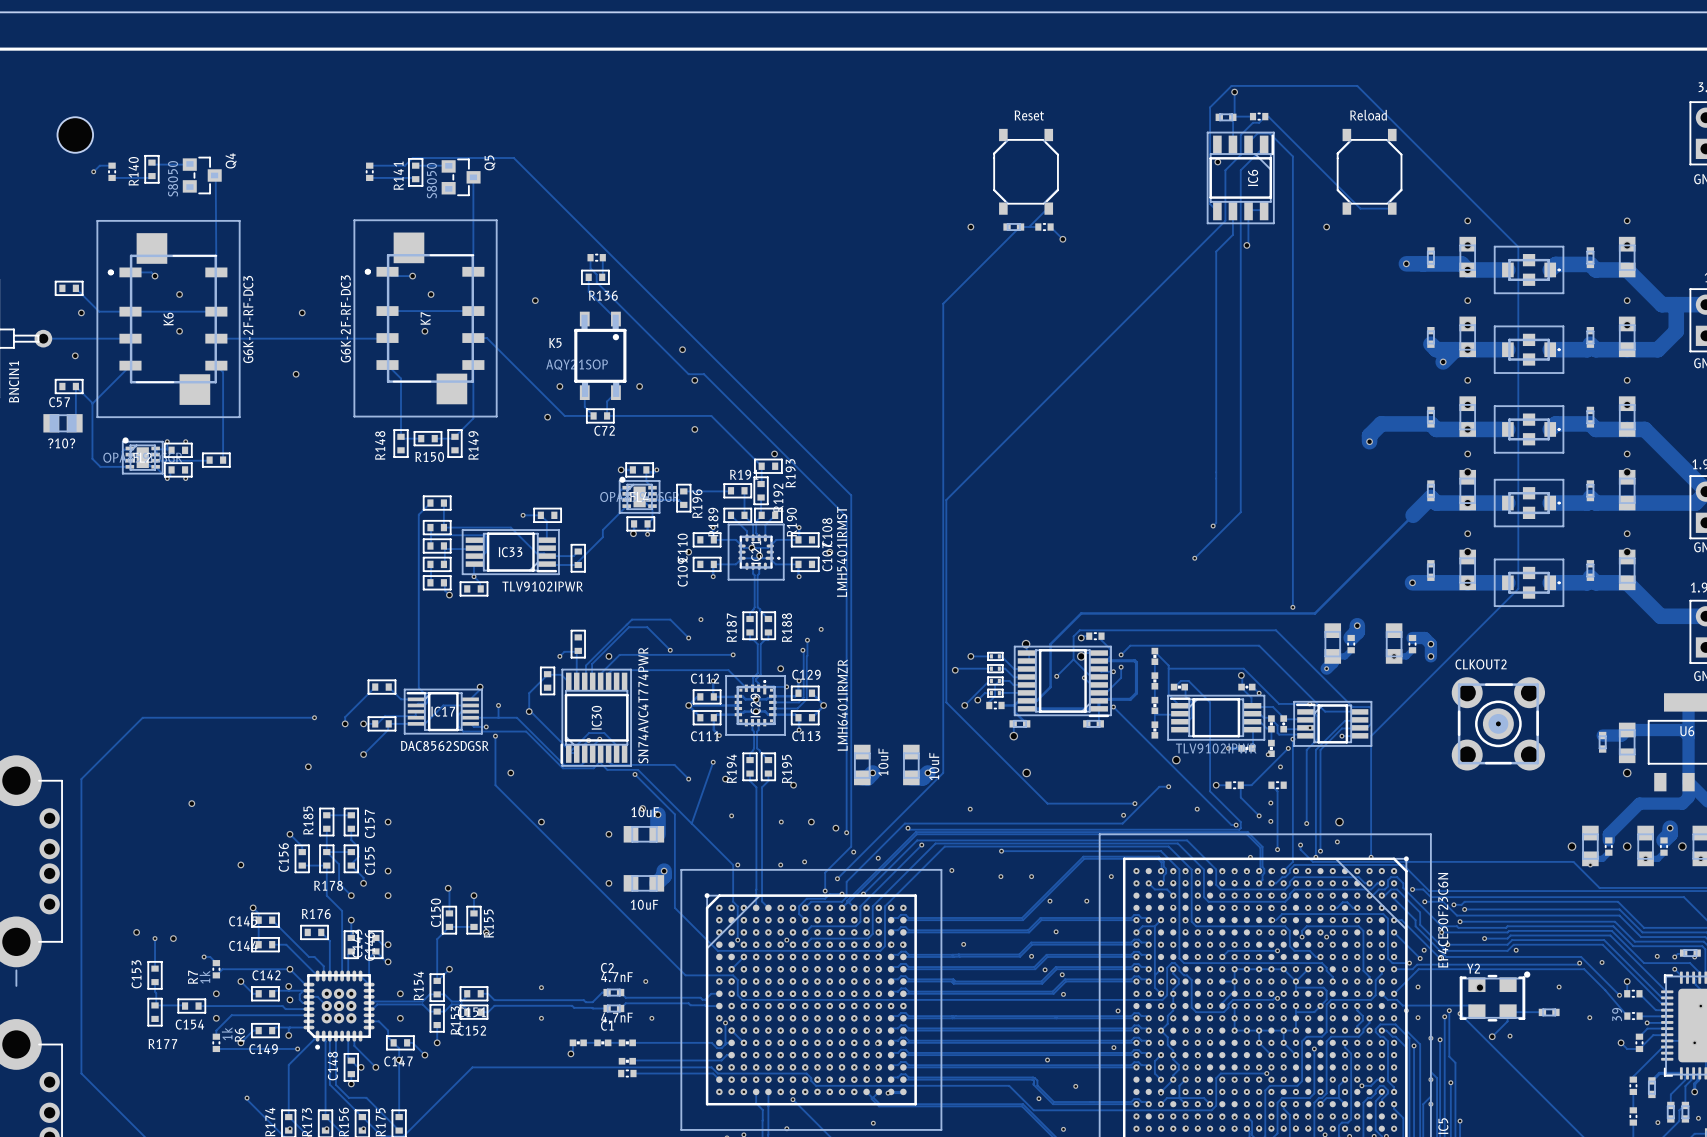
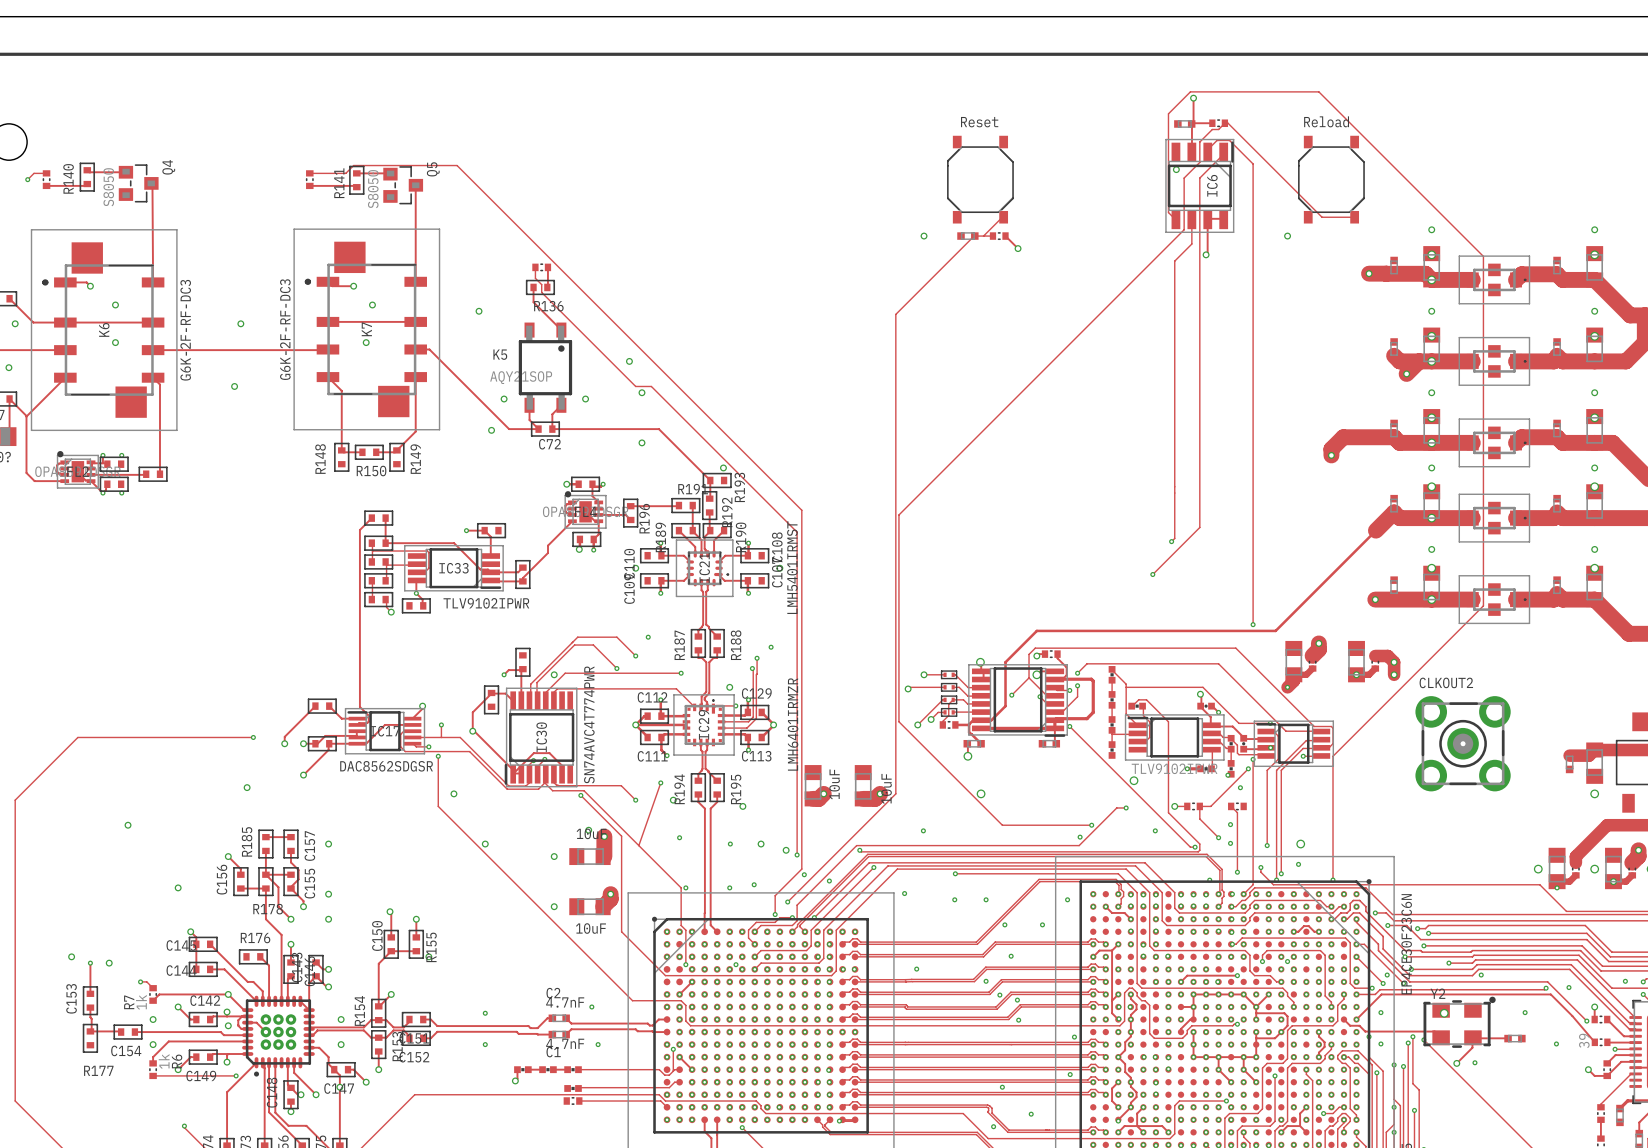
track: (742, 545) (744, 547) (768, 547) (770, 545) -> none
via: (751, 547) -> none
via: (759, 555) -> none
track: (742, 558) (757, 558) (759, 555) (762, 558) (769, 558) -> none
track: (738, 696) (742, 696) (745, 699) (766, 699) (772, 696) -> none
via: (756, 699) -> none
track: (756, 711) (765, 711) (768, 714) (772, 714) -> none
track: (756, 711) (744, 711) (738, 714) -> none
via: (756, 711) -> none

